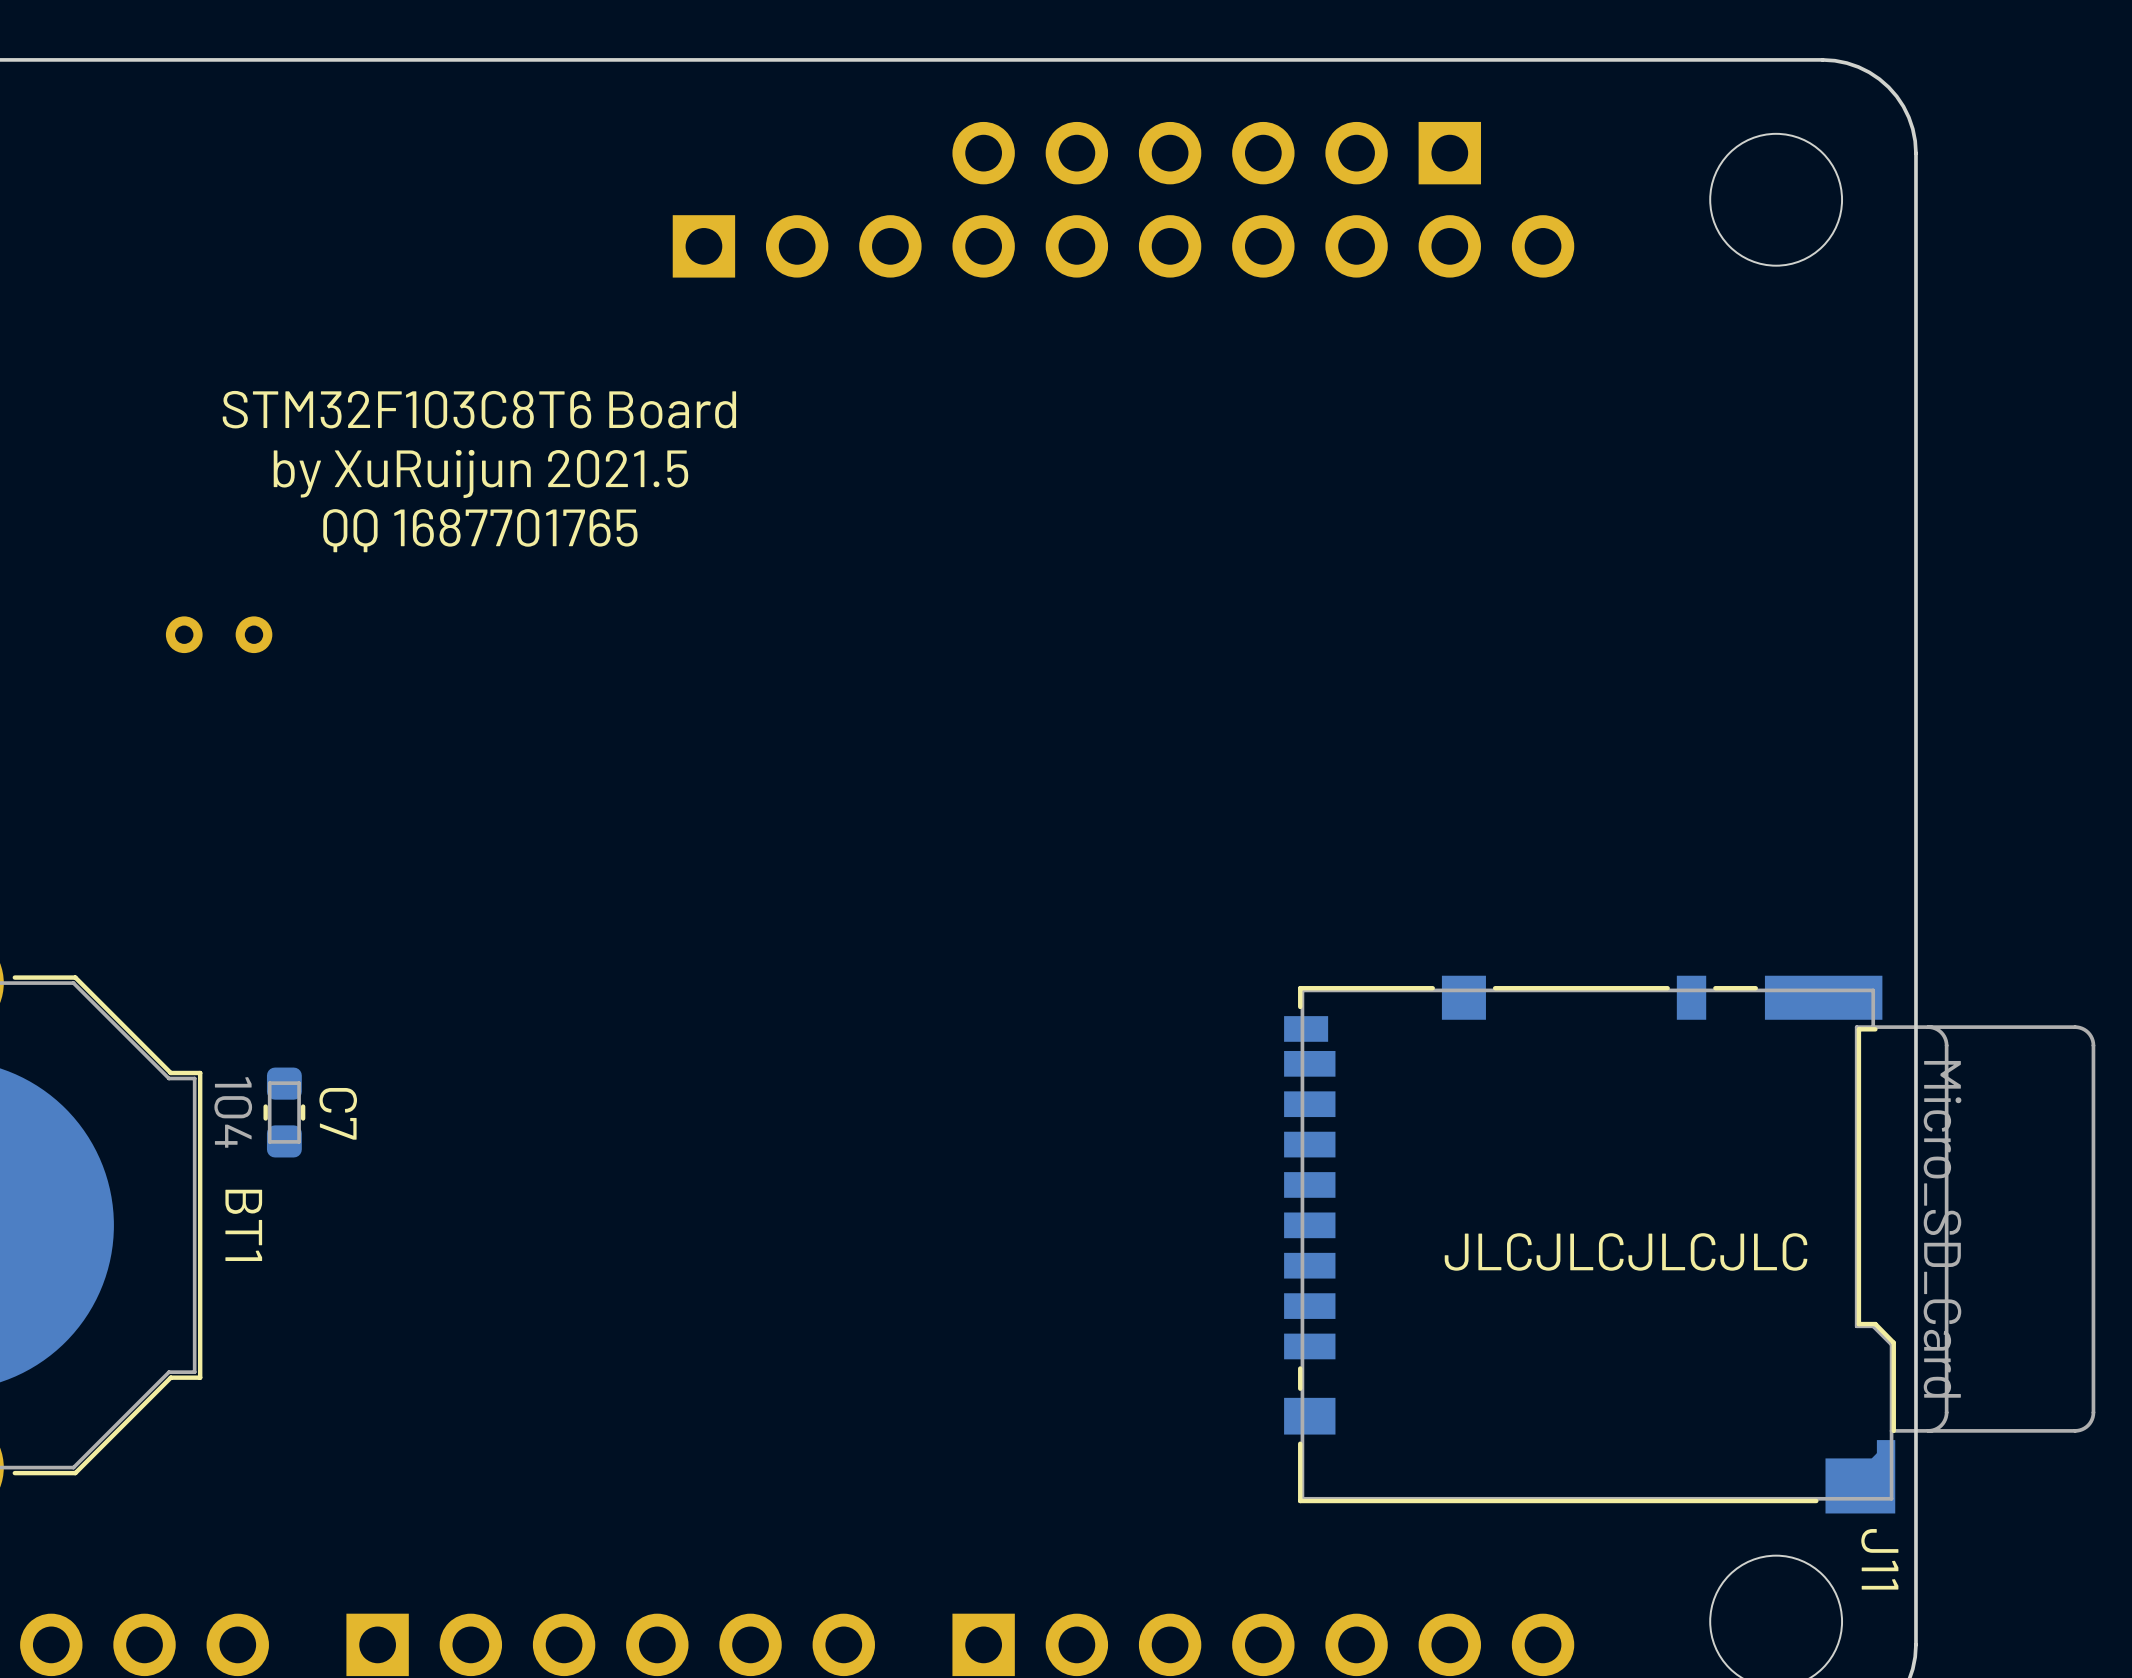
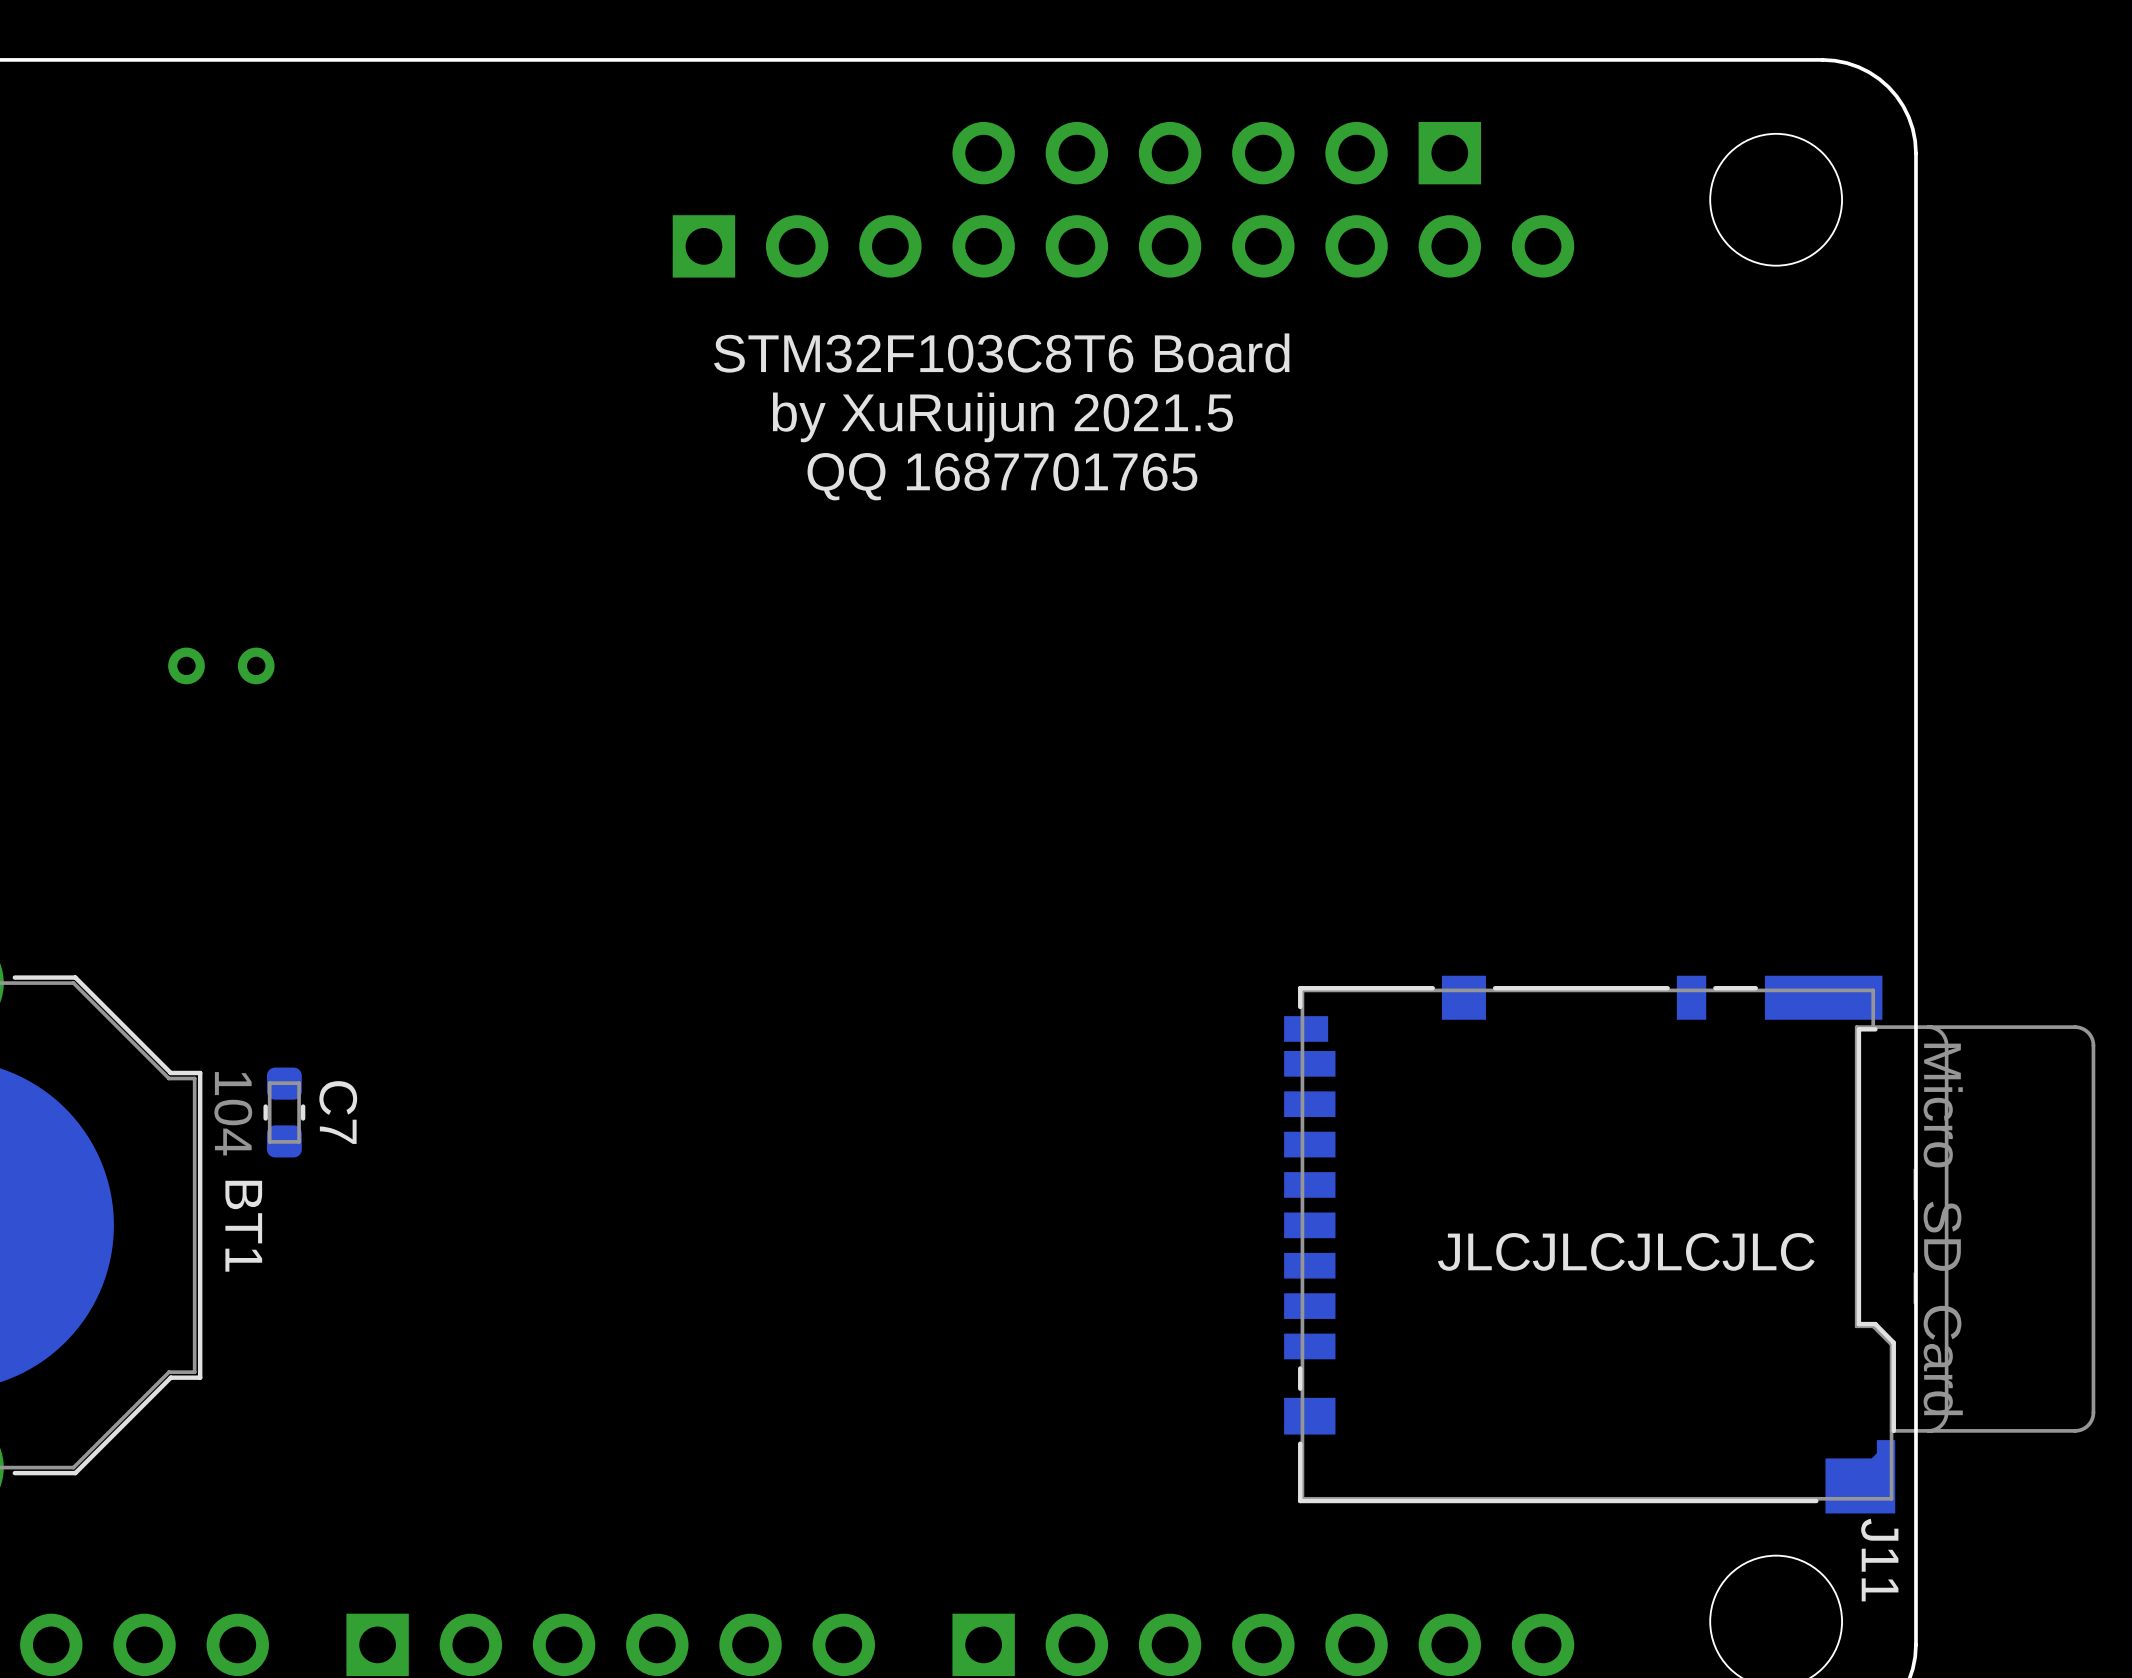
text position: STM32F103C8T6 Board (479, 409) -> STM32F103C8T6 Board (1001, 353)
text position: by XuRuijun 2021.5 (480, 473) -> by XuRuijun 2021.5 (1002, 417)
text position: QQ 1687701765 (480, 530) -> QQ 1687701765 (1002, 476)
part position: (219, 634) -> (221, 665)

